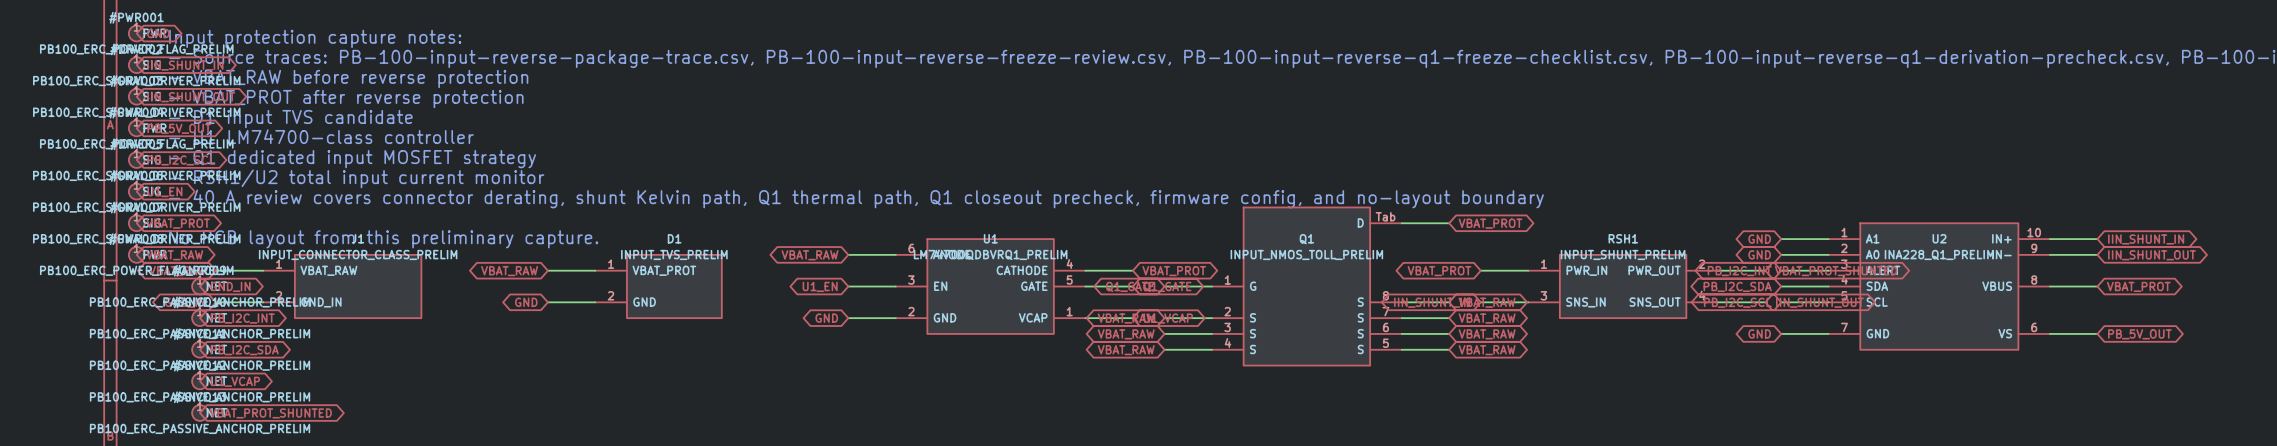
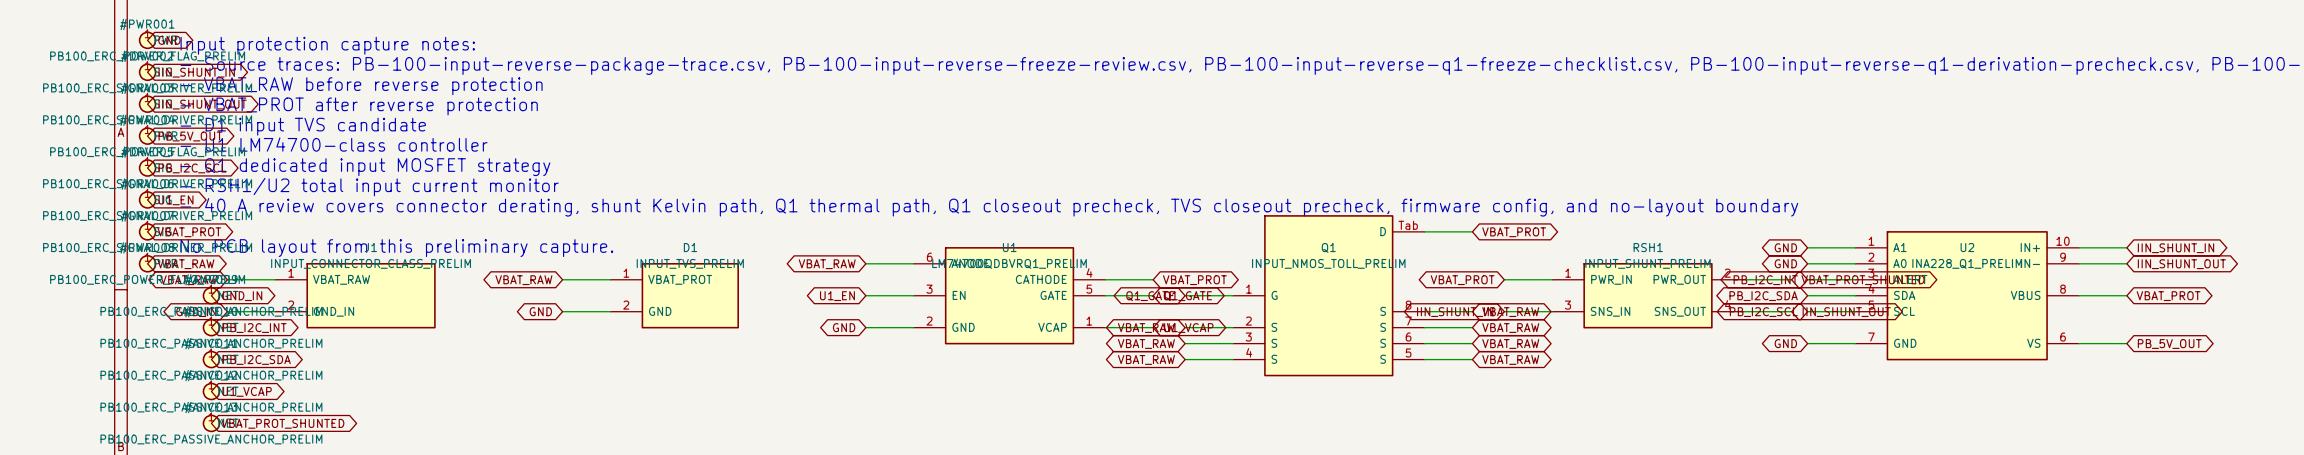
text: - 40 A review covers connector derating, shunt Kelvin path, Q1 thermal path, Q1 closeout precheck, firmware config, and no-layout boundary (856, 198) -> - 40 A review covers connector derating, shunt Kelvin path, Q1 thermal path, Q1 closeout precheck, TVS closeout precheck, firmware config, and no-layout boundary (989, 207)

